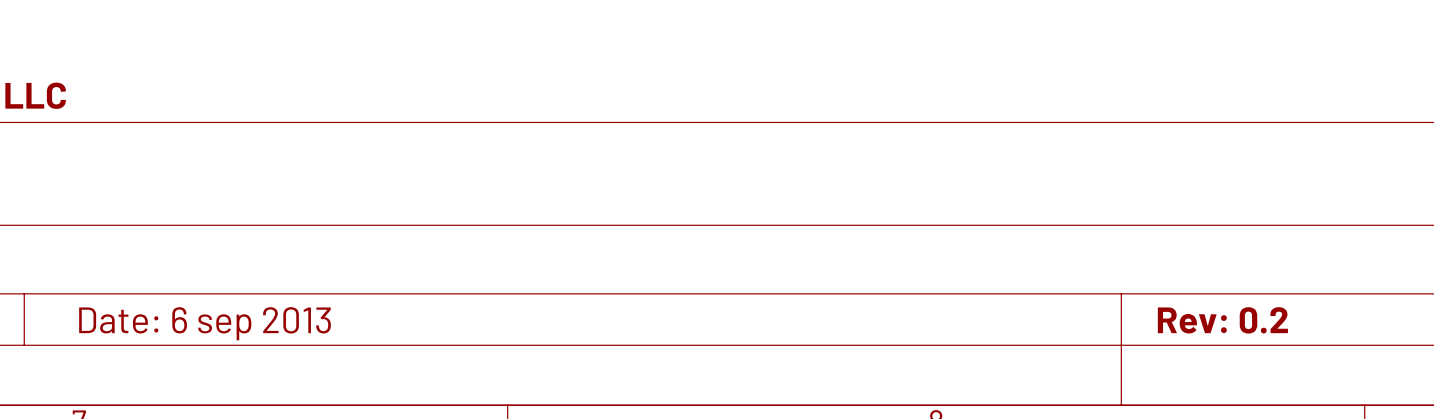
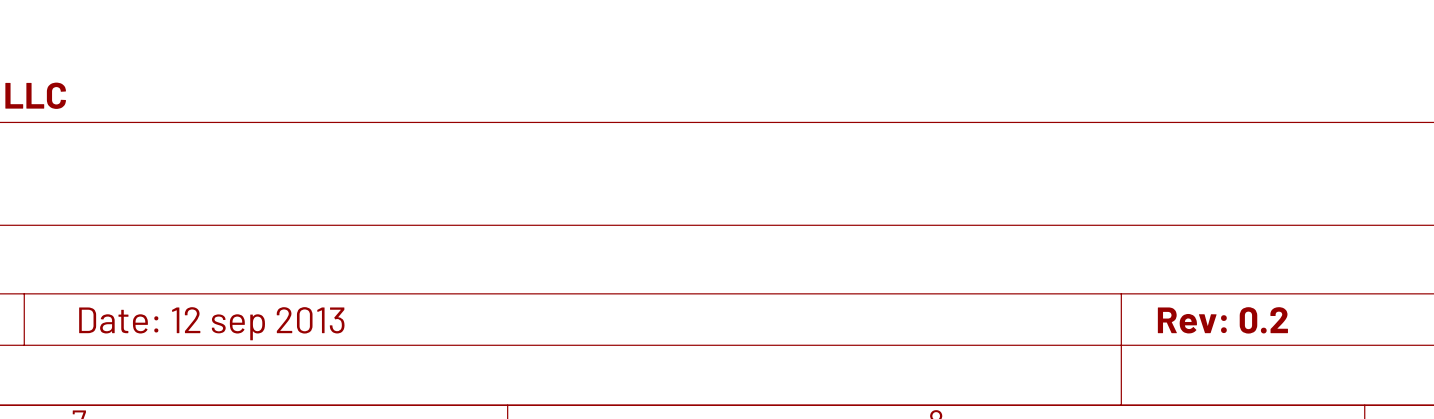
title block: Date: 6 sep 2013 (205, 323) -> Date: 12 sep 2013 (211, 323)

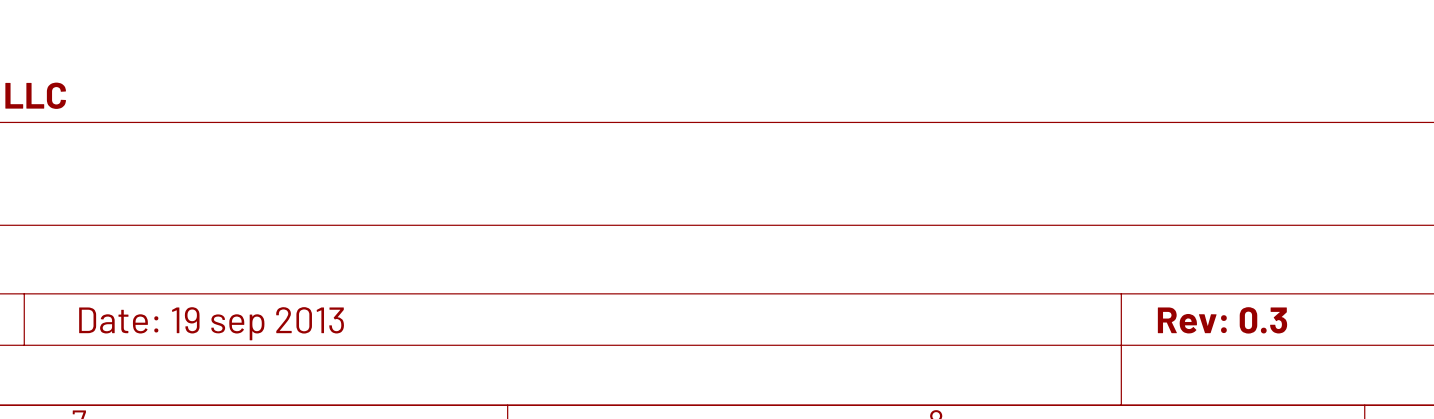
title block: Rev: 0.2 (1222, 320) -> Rev: 0.3 (1222, 320)
title block: Date: 12 sep 2013 (211, 323) -> Date: 19 sep 2013 (211, 323)

